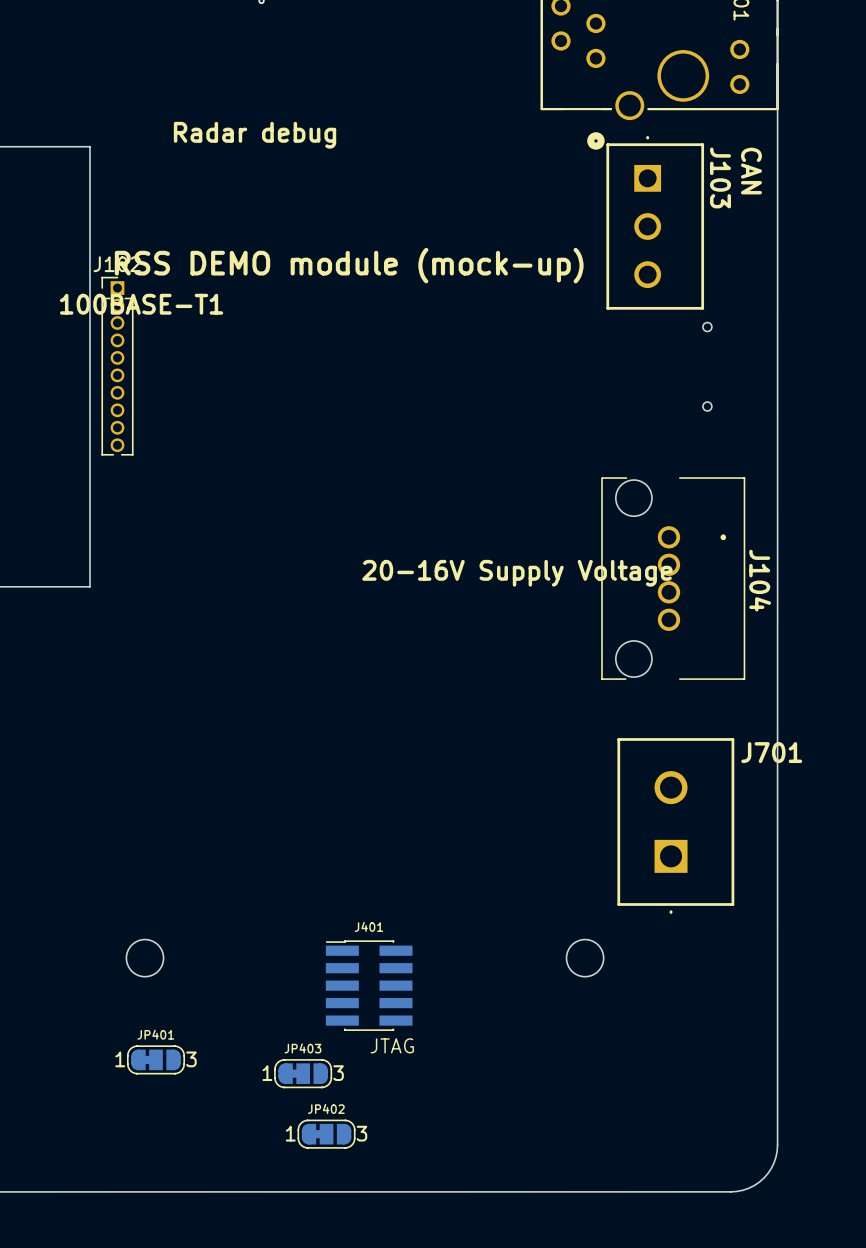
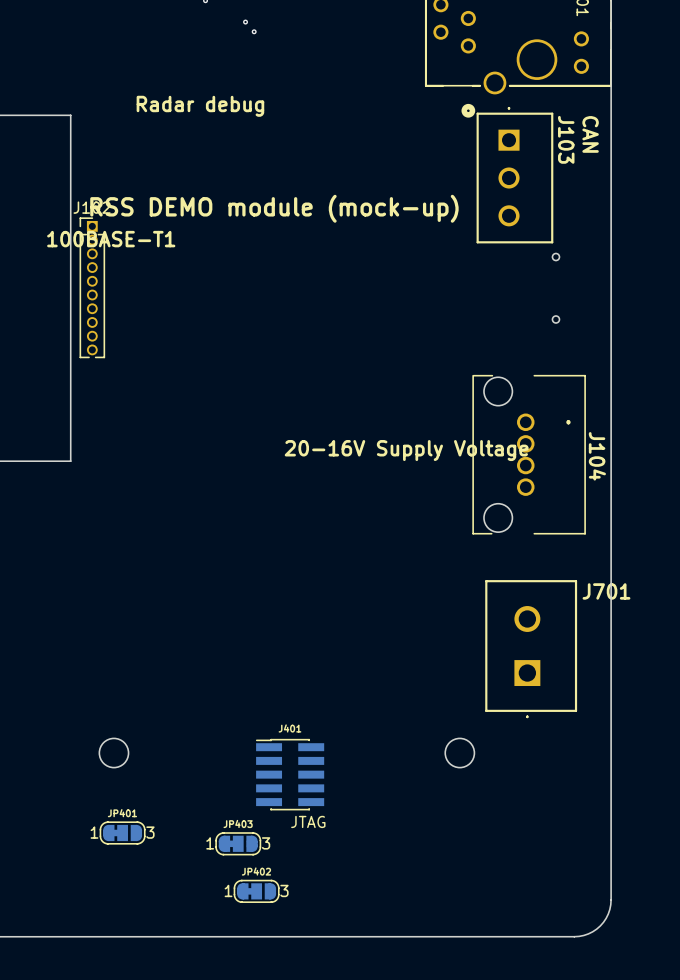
via: none -> (245, 22)
via: none -> (254, 31)

